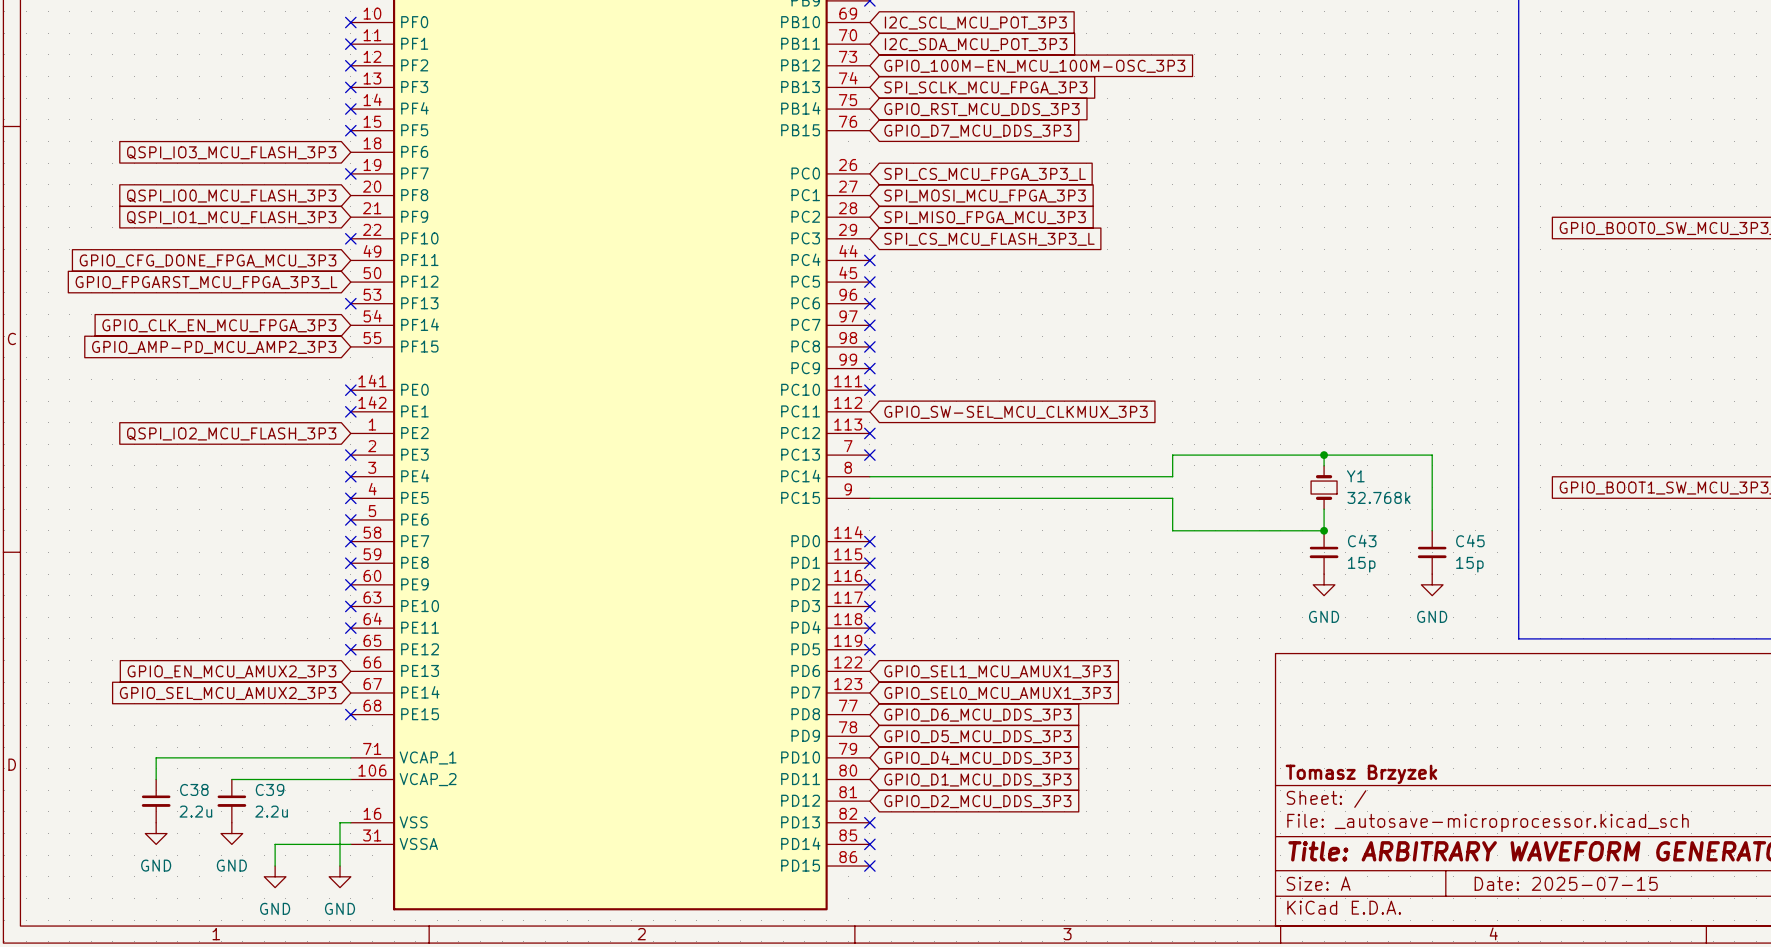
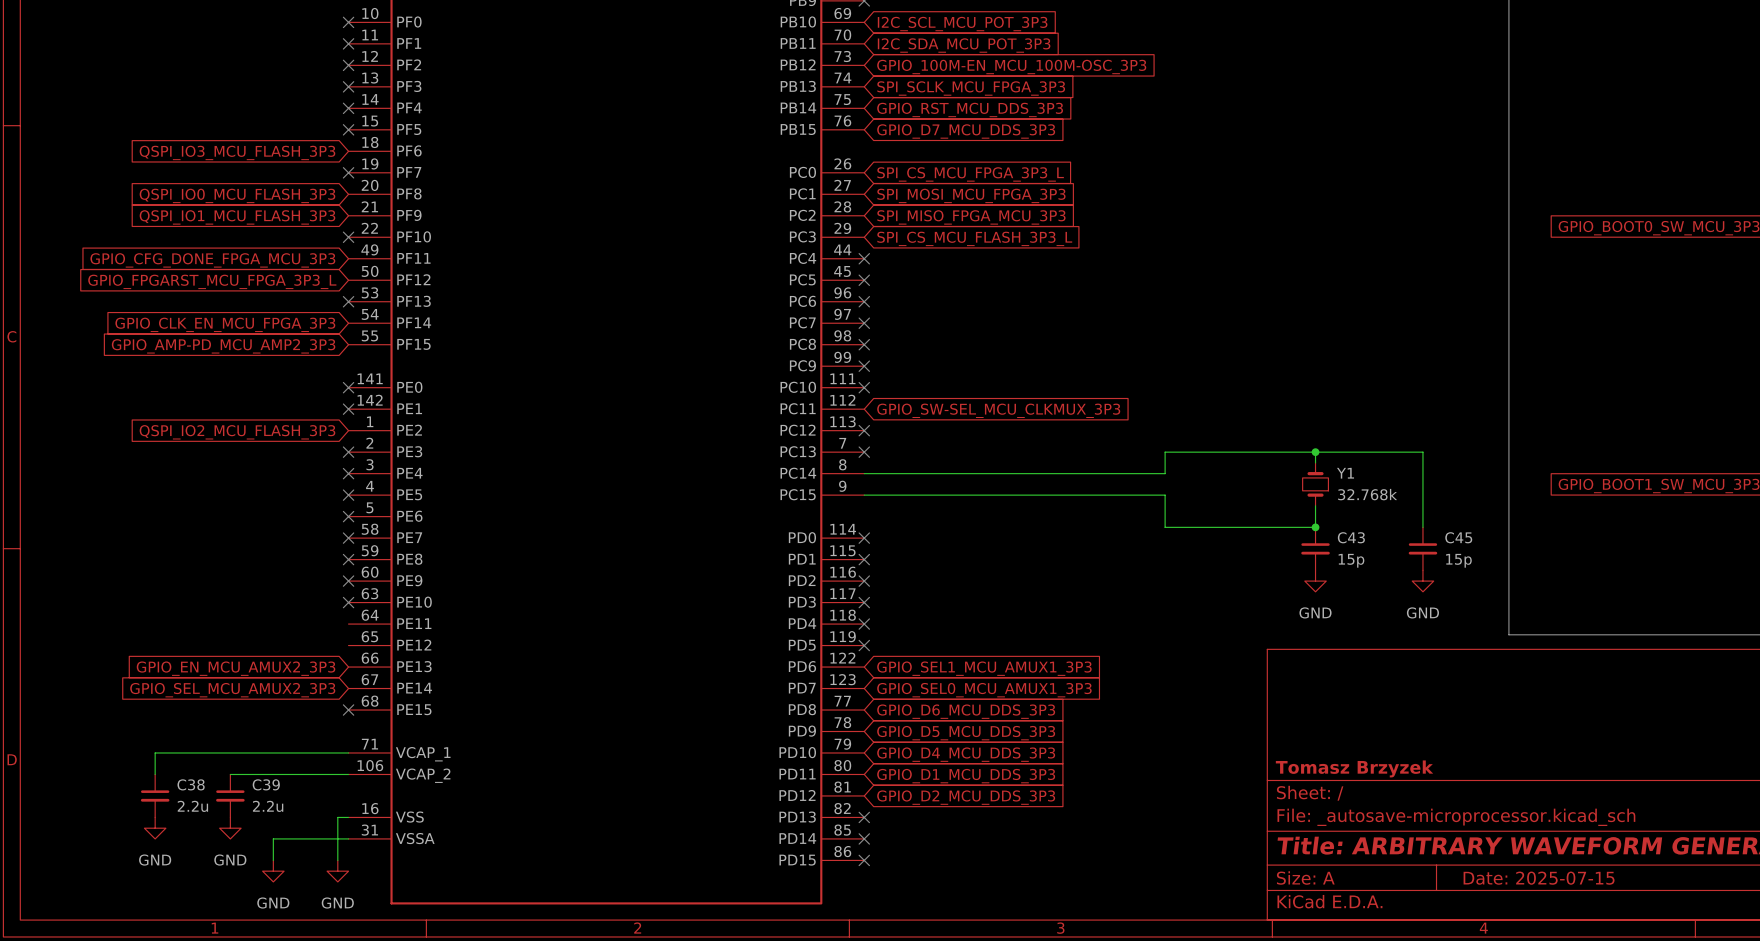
no-connect mark: (350, 628) -> none
no-connect mark: (350, 649) -> none

